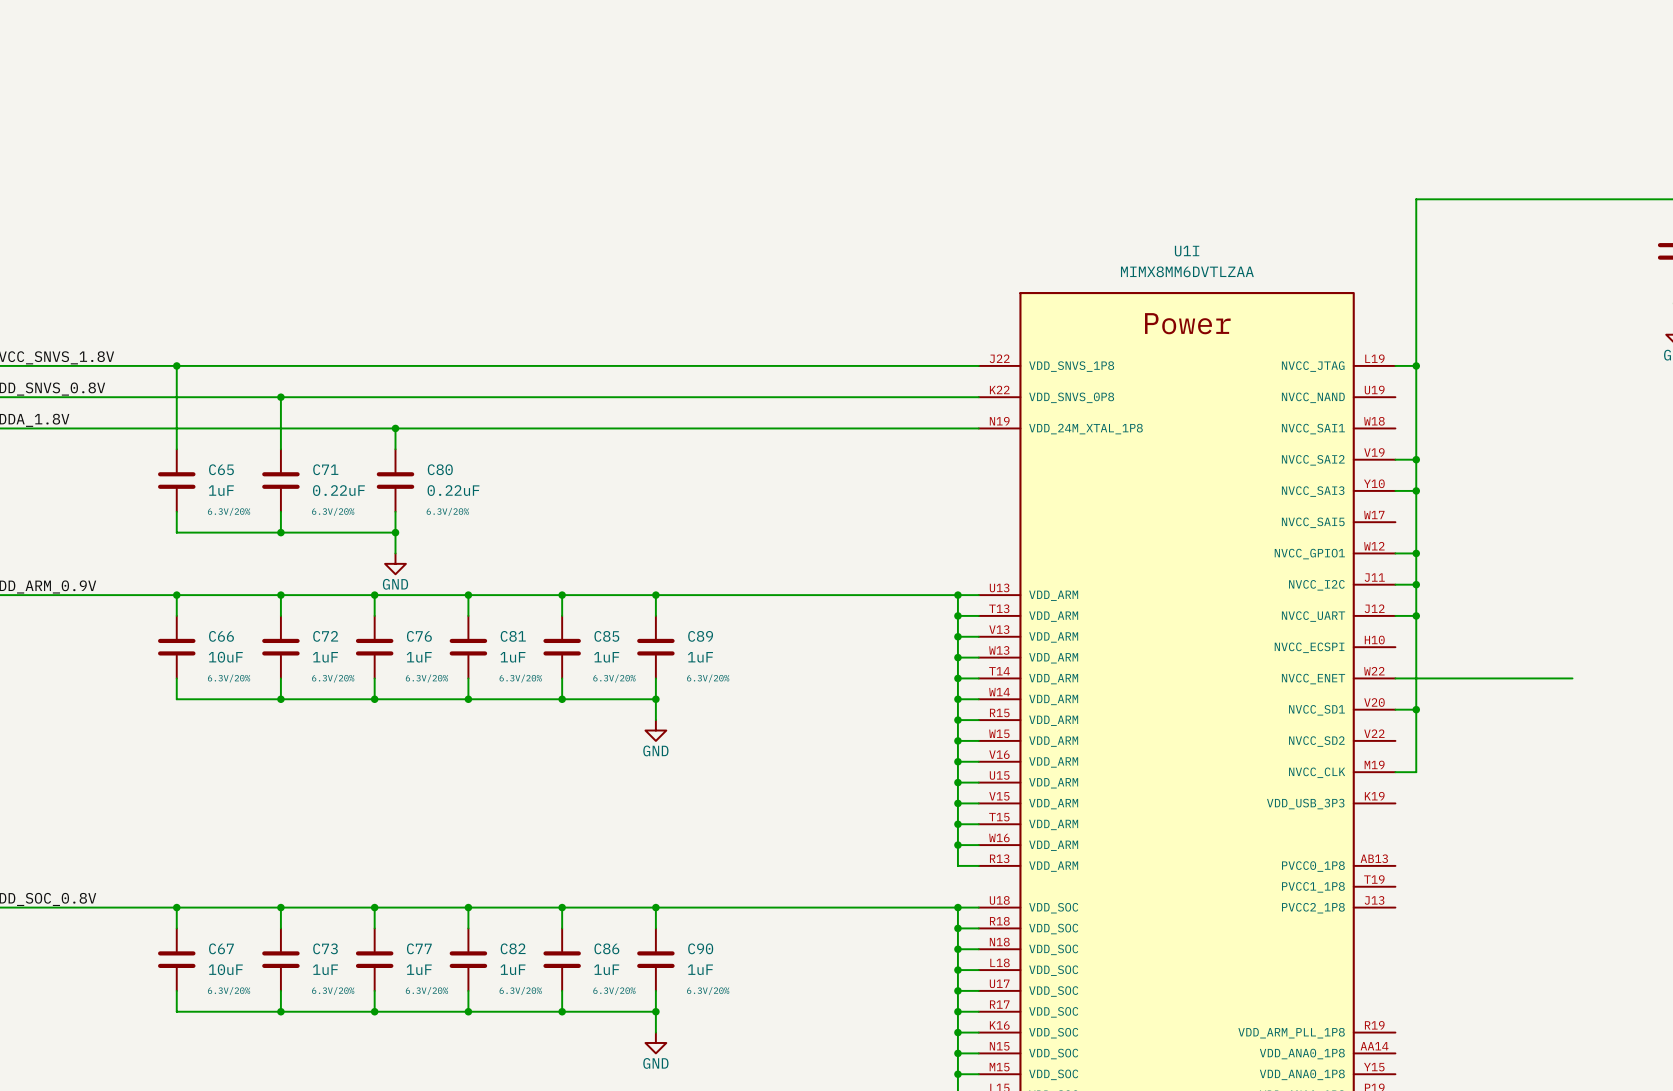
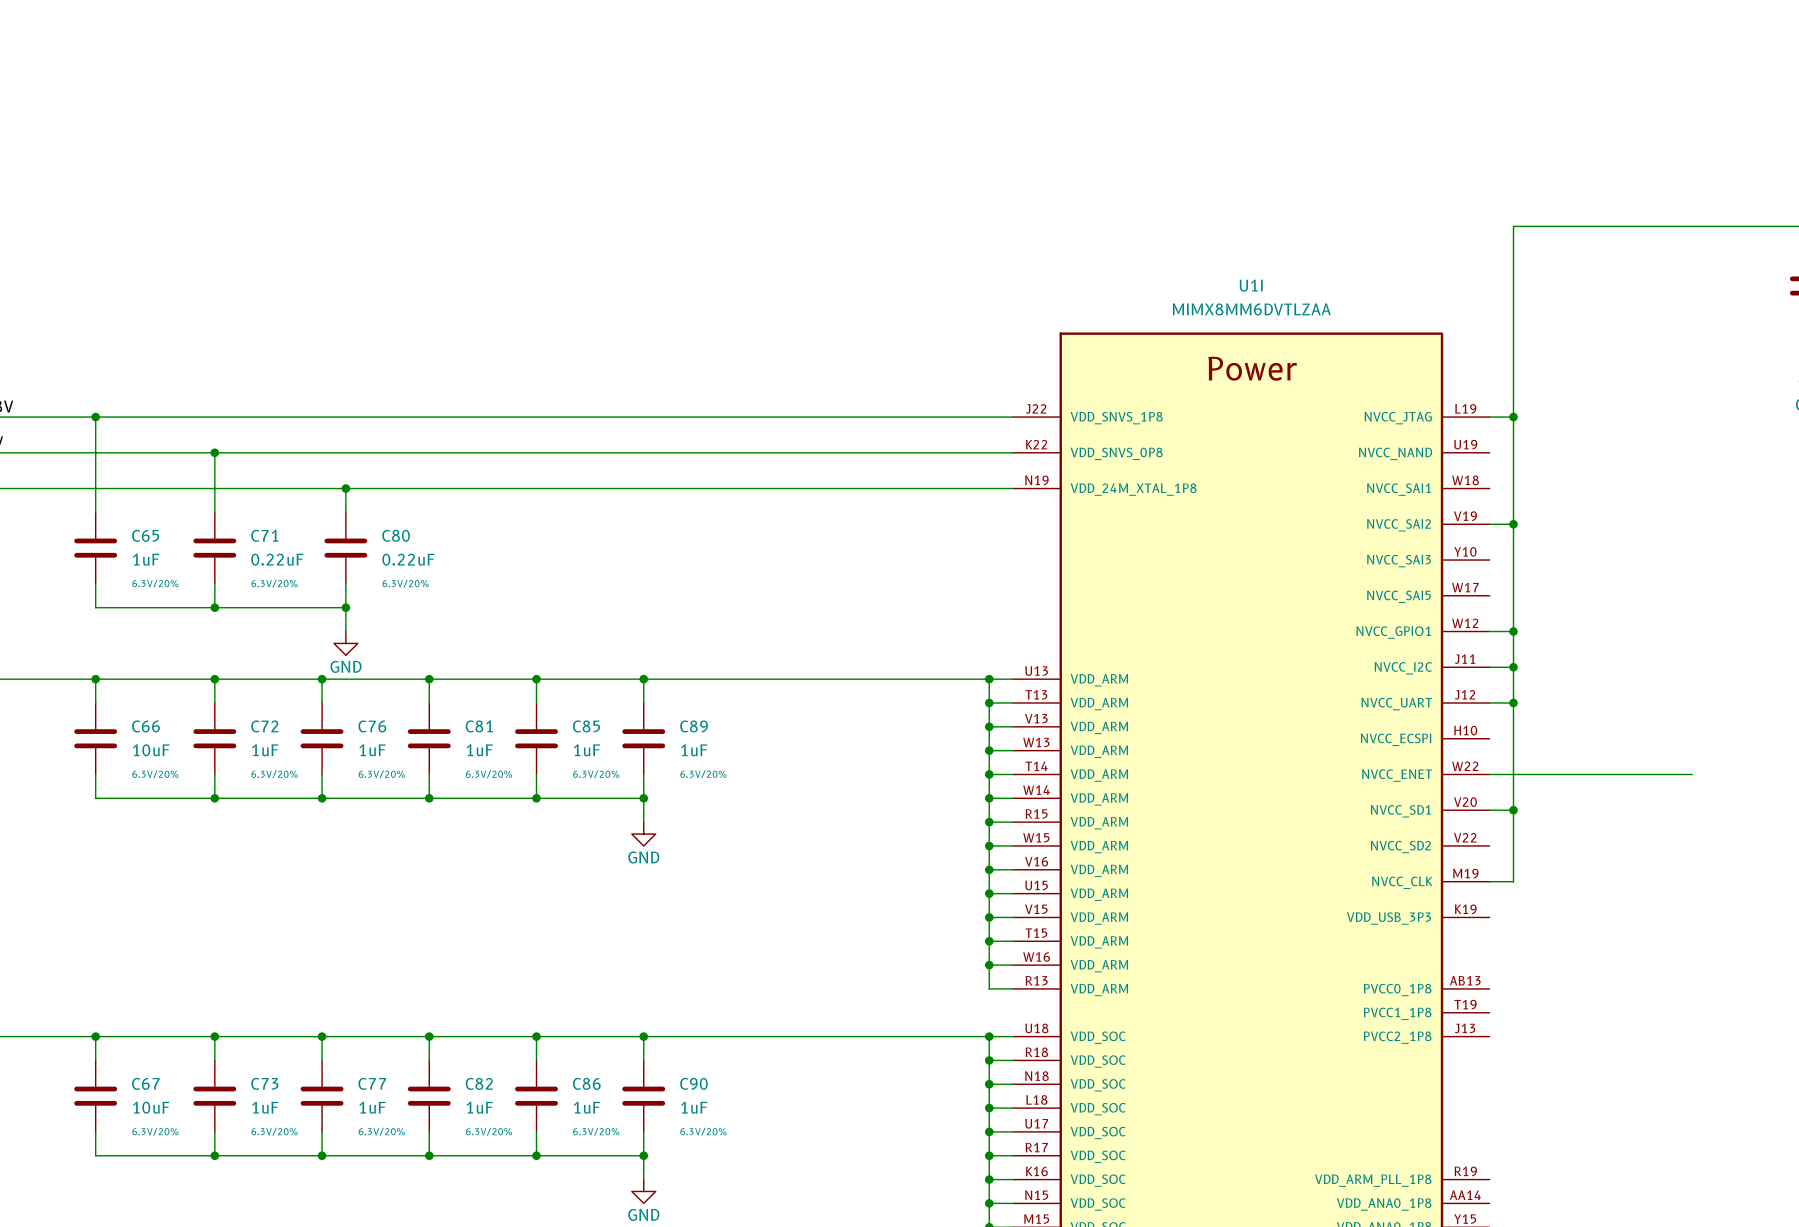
wire: (1395, 490) (1416, 490) -> none
junction: (1416, 490) -> none

